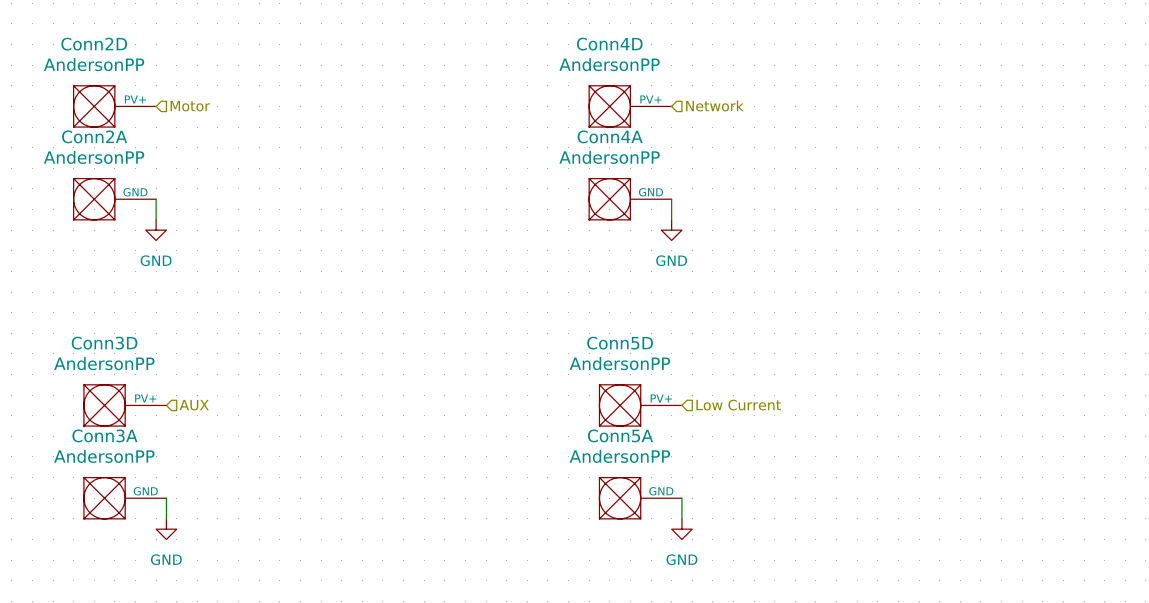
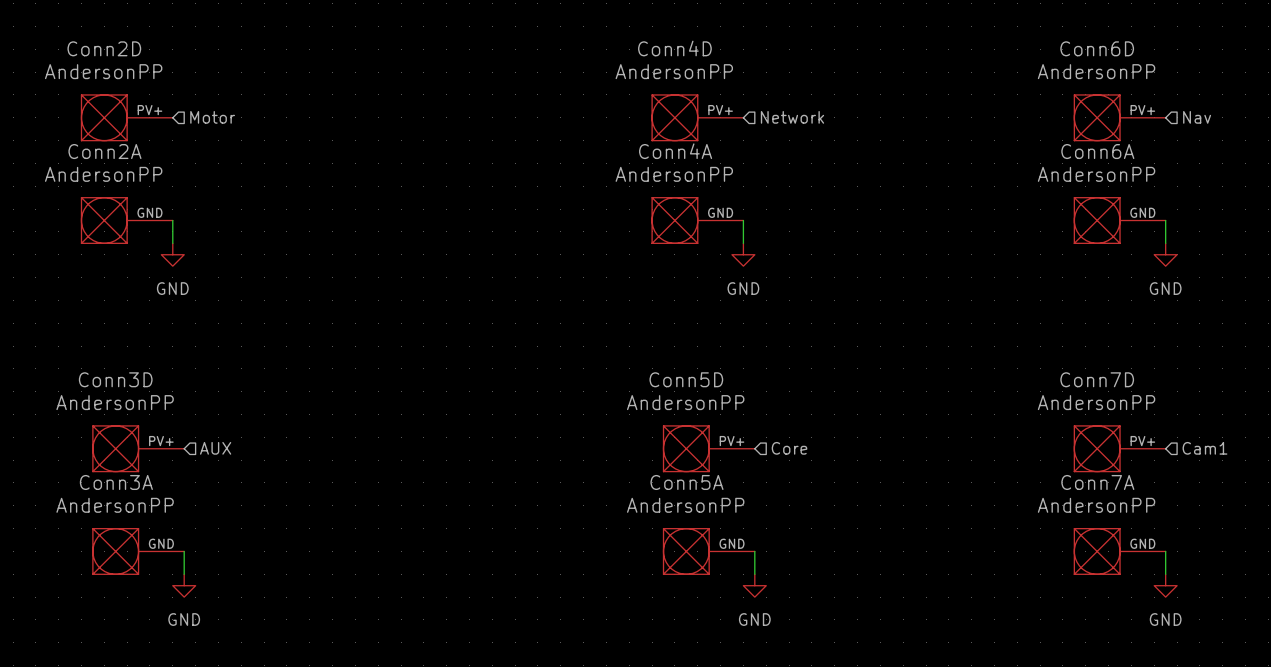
Conn6D: none -> AndersonPP (1120, 117)
hierarchical label: none -> Nav (1197, 117)
Conn6A: none -> AndersonPP (1120, 220)
wire: none -> (1165, 220) (1165, 243)
power symbol: none -> GND (1165, 254)
hierarchical label: Low Current (738, 405) -> Core (789, 448)
Conn7D: none -> AndersonPP (1120, 448)
hierarchical label: none -> Cam1 (1204, 448)
Conn7A: none -> AndersonPP (1120, 551)
wire: none -> (1165, 551) (1165, 574)
power symbol: none -> GND (1165, 585)

